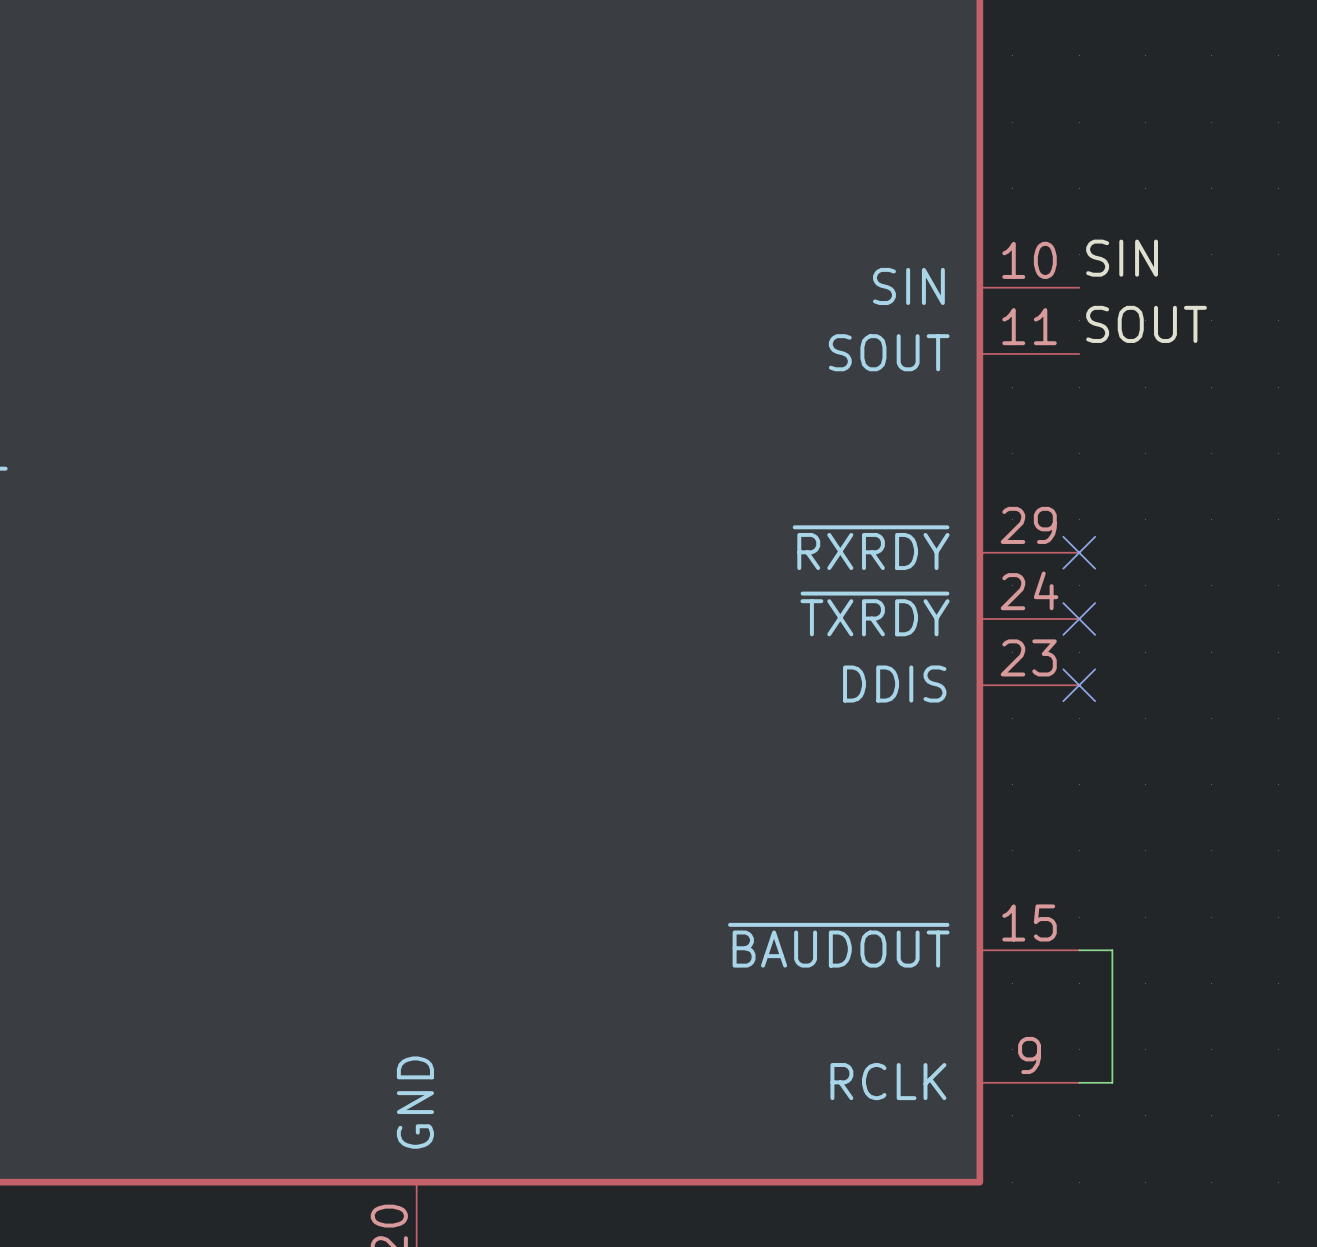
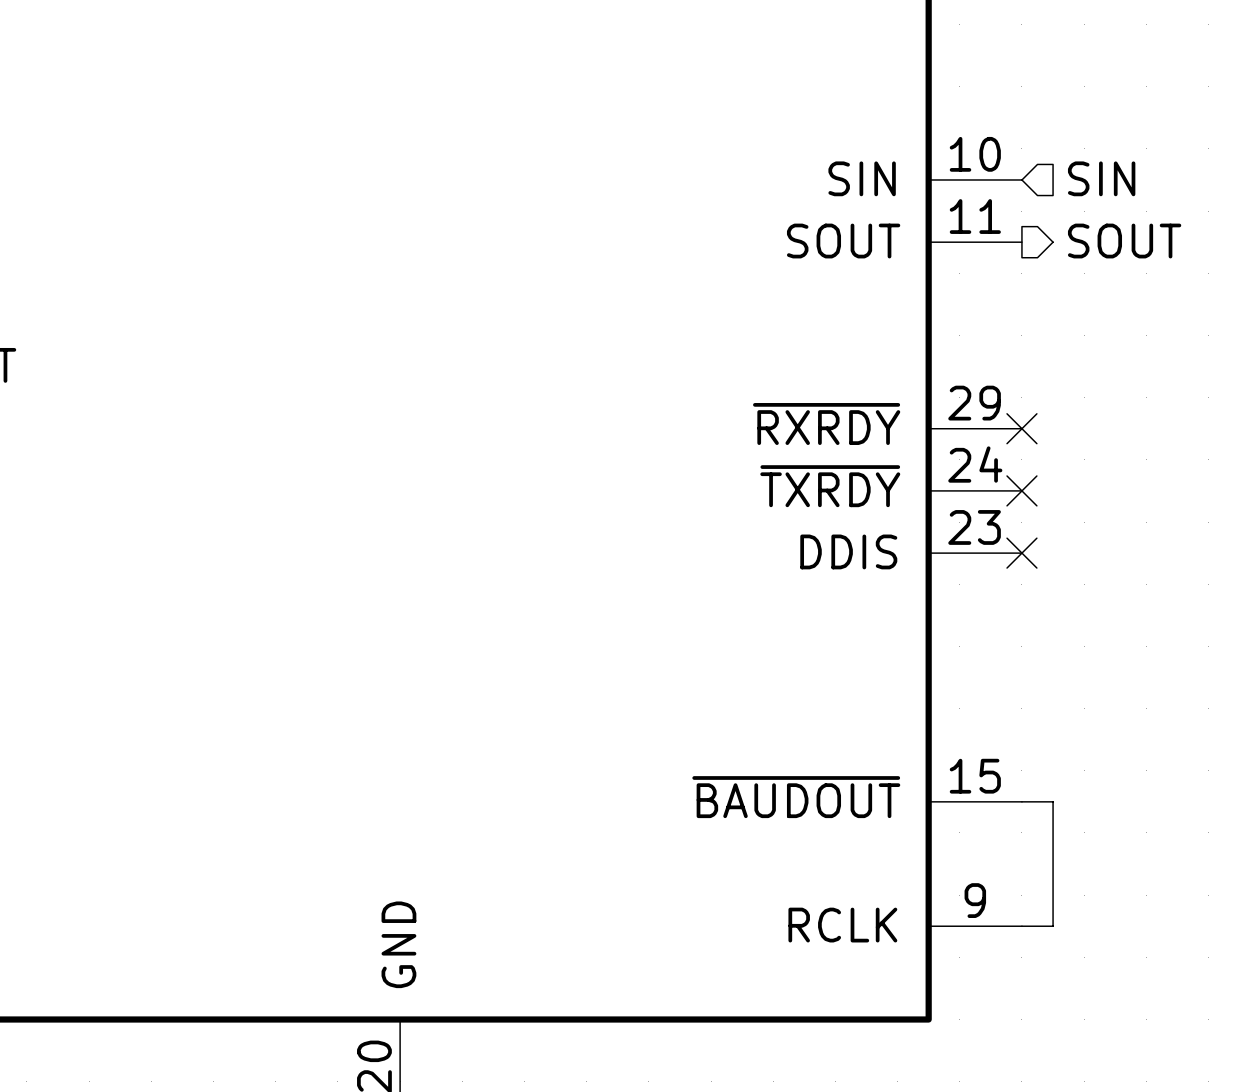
label: SIN (1122, 258) -> none
hierarchical label: none -> SIN (1101, 178)
label: SOUT (1146, 324) -> none
hierarchical label: none -> SOUT (1124, 241)

